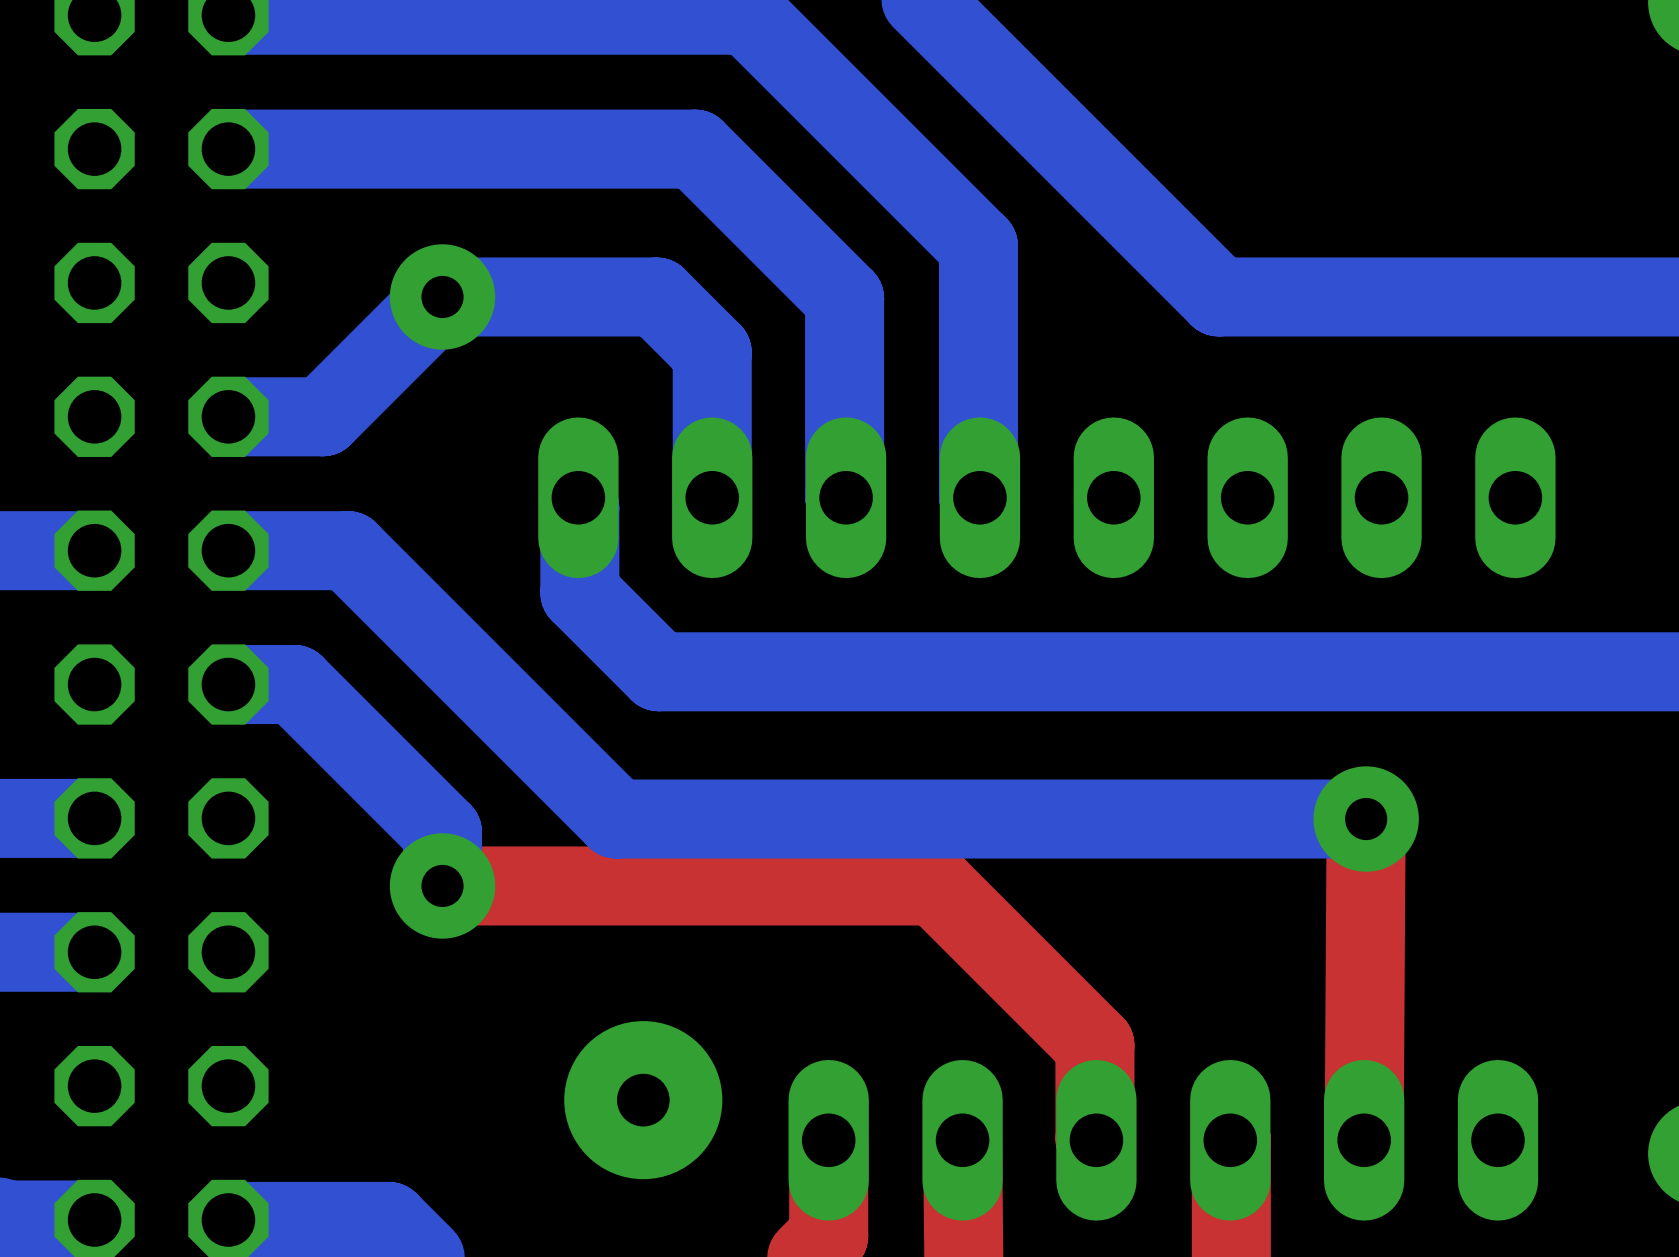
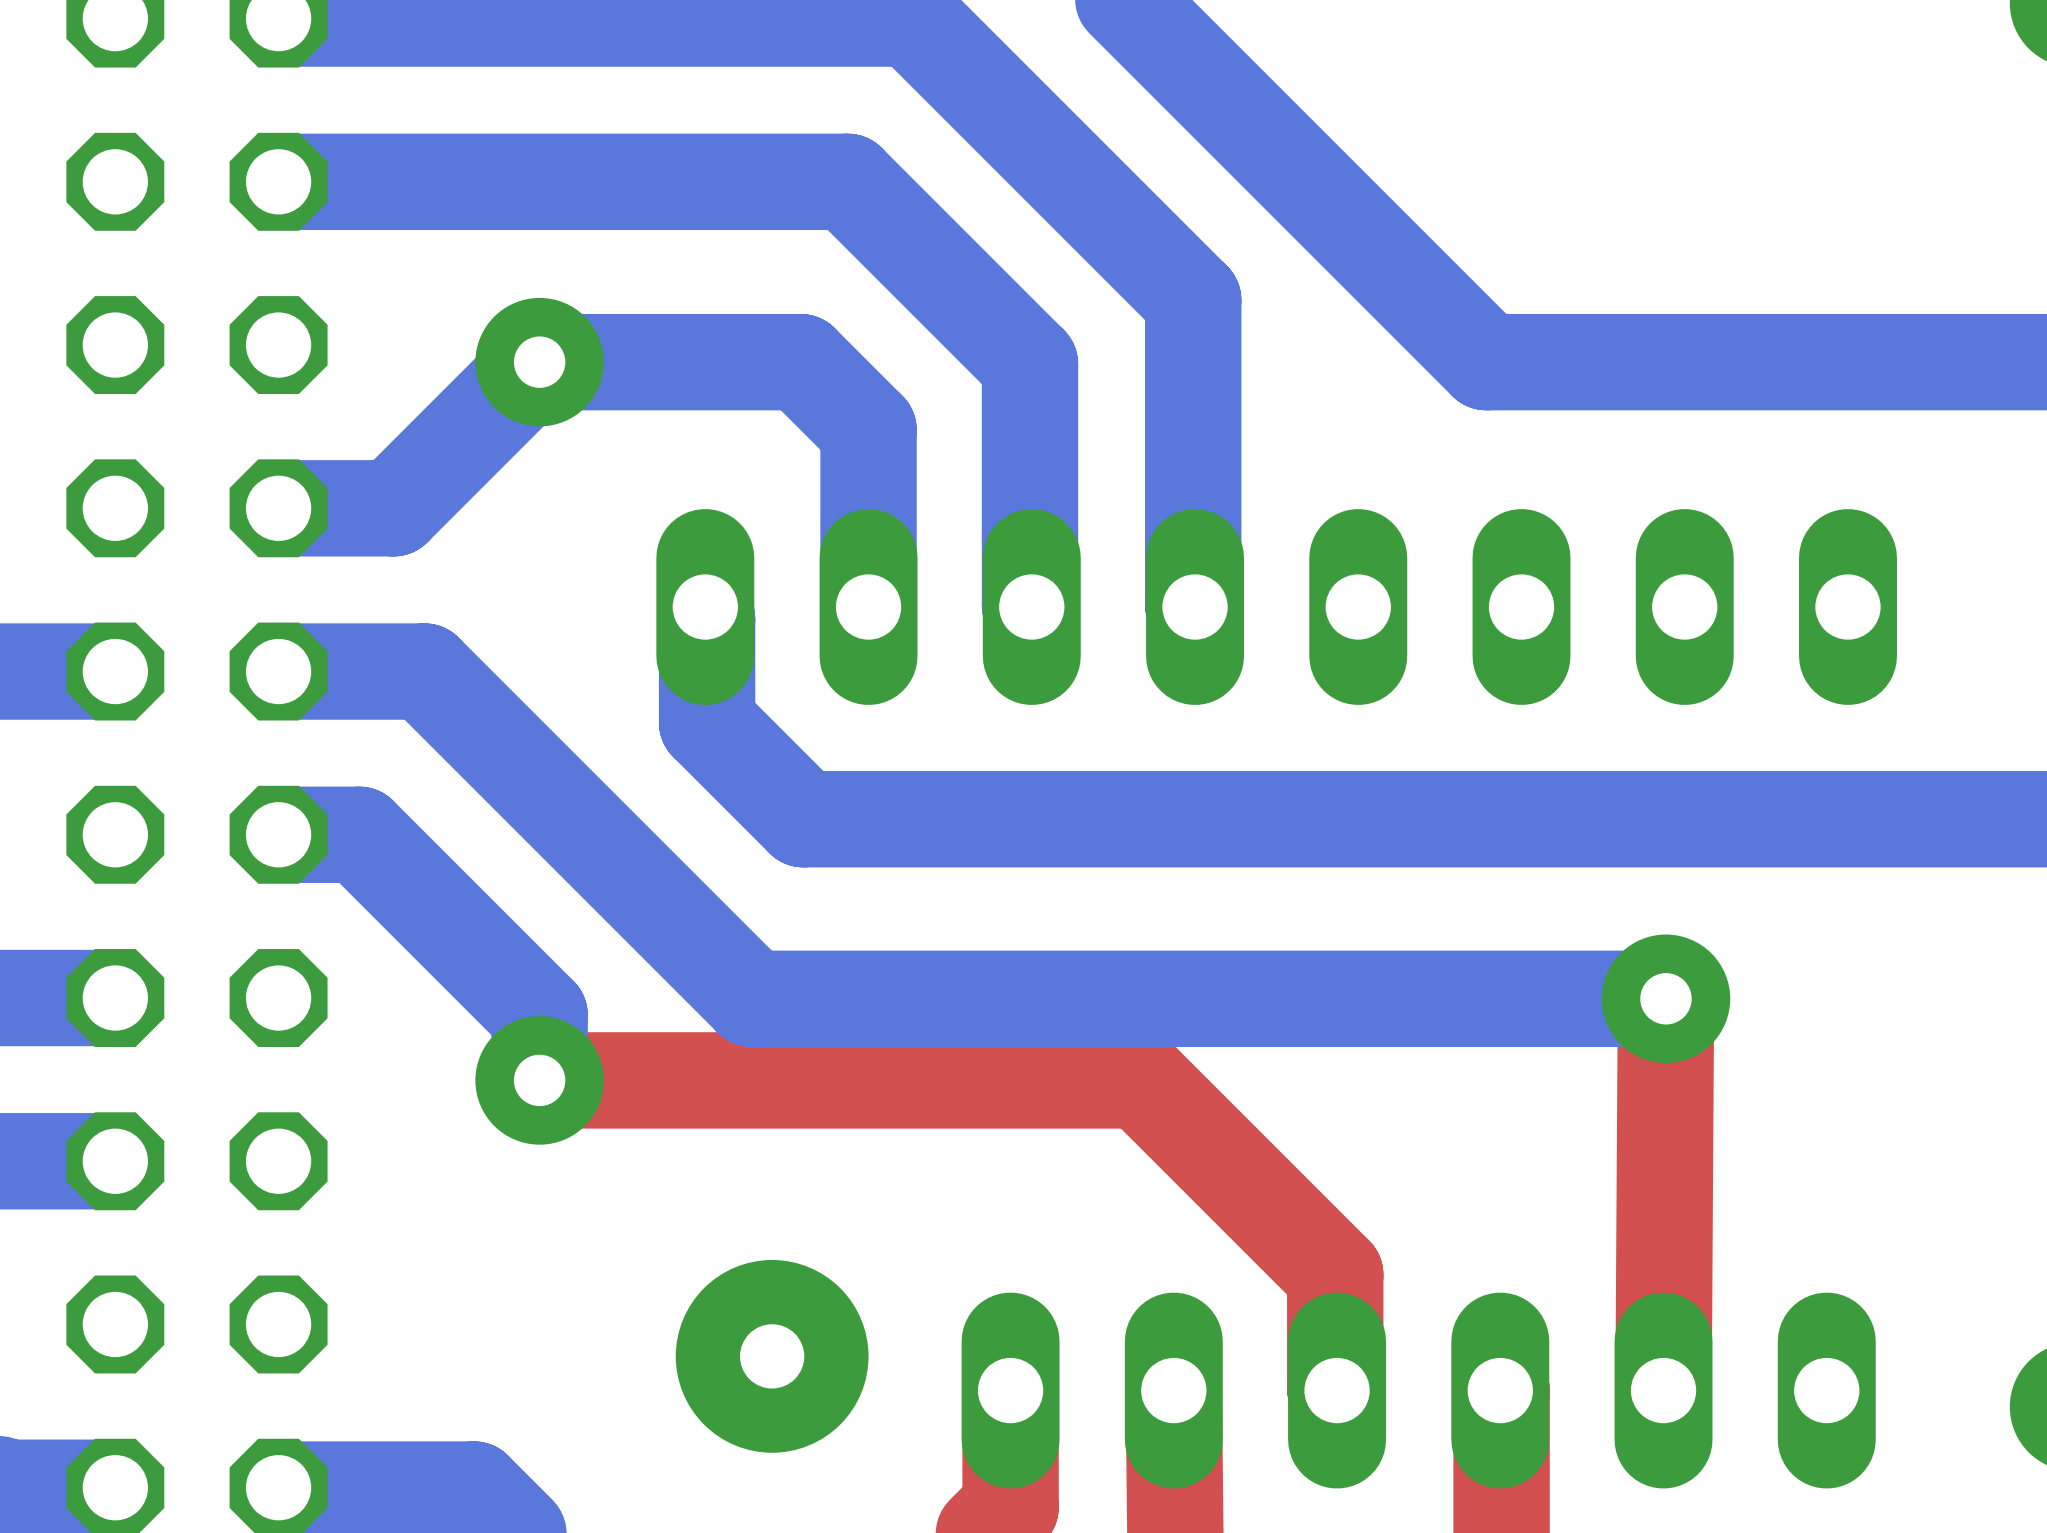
via position: (643, 1100) -> (772, 1356)

